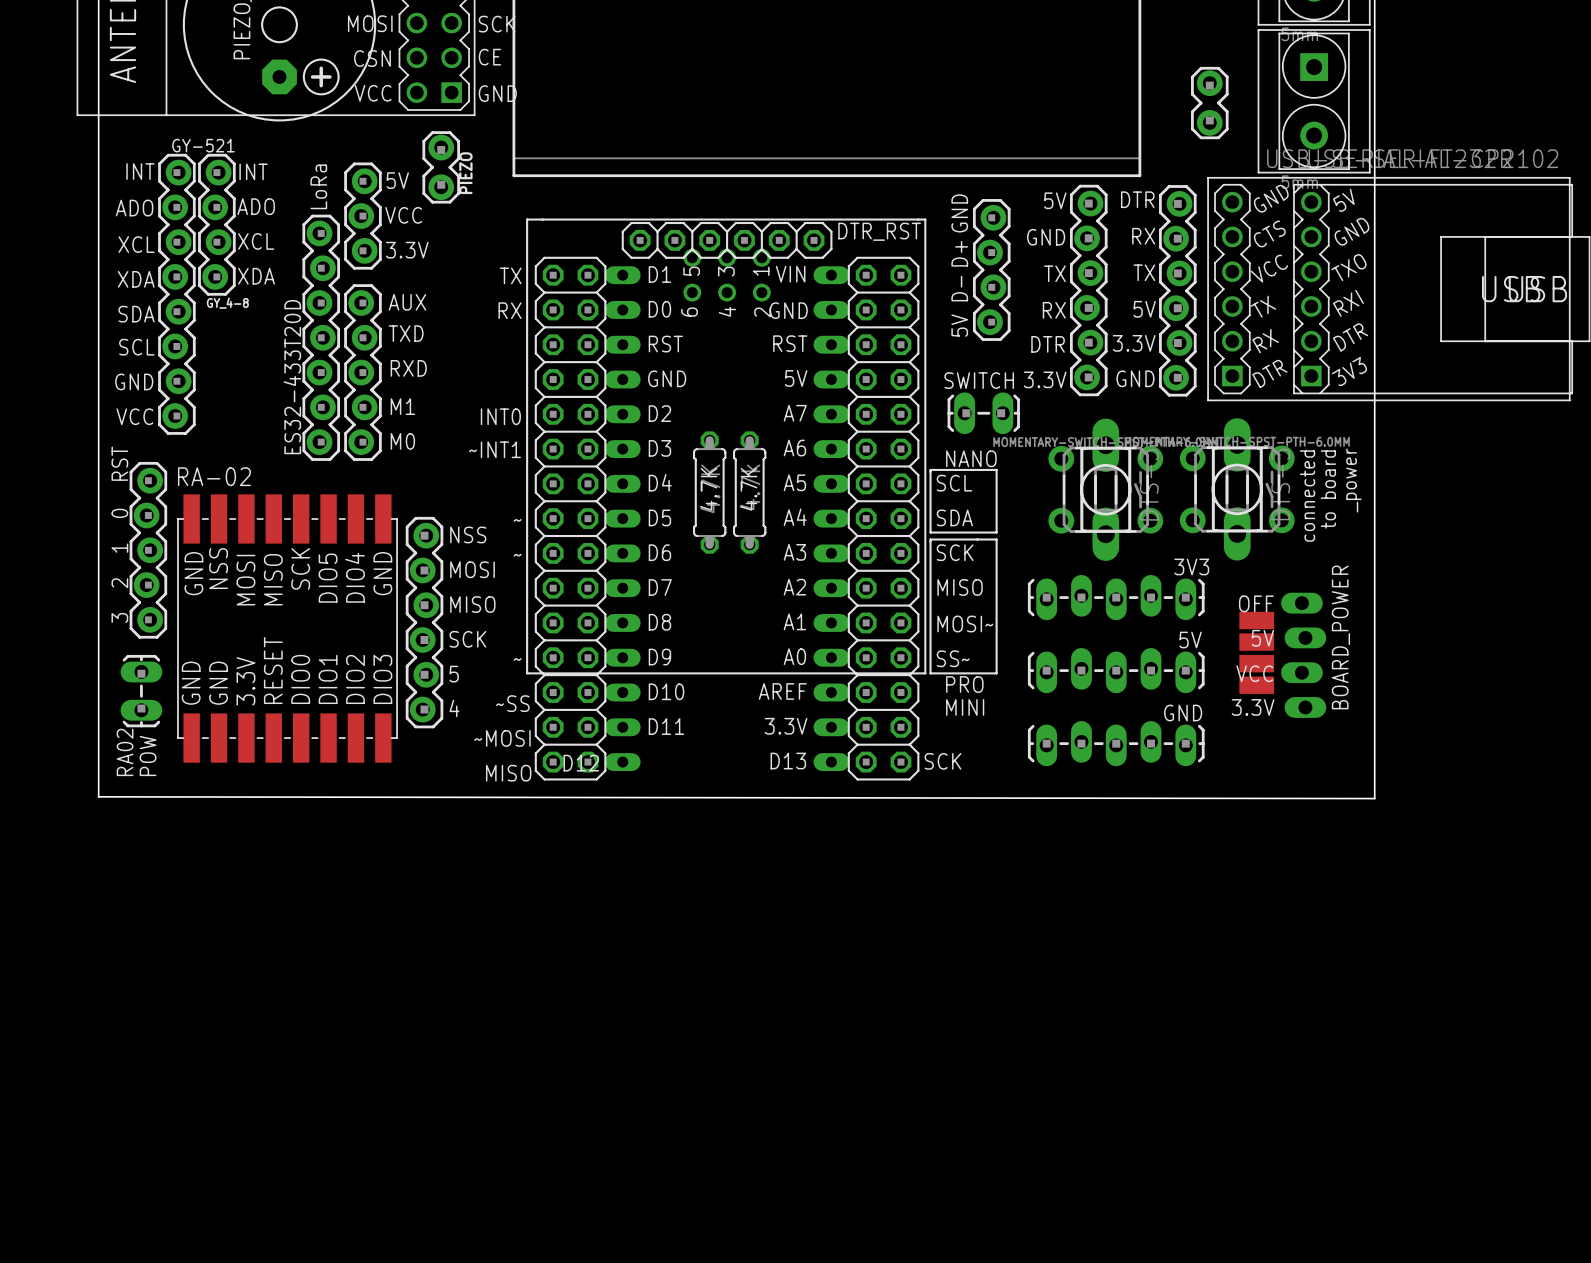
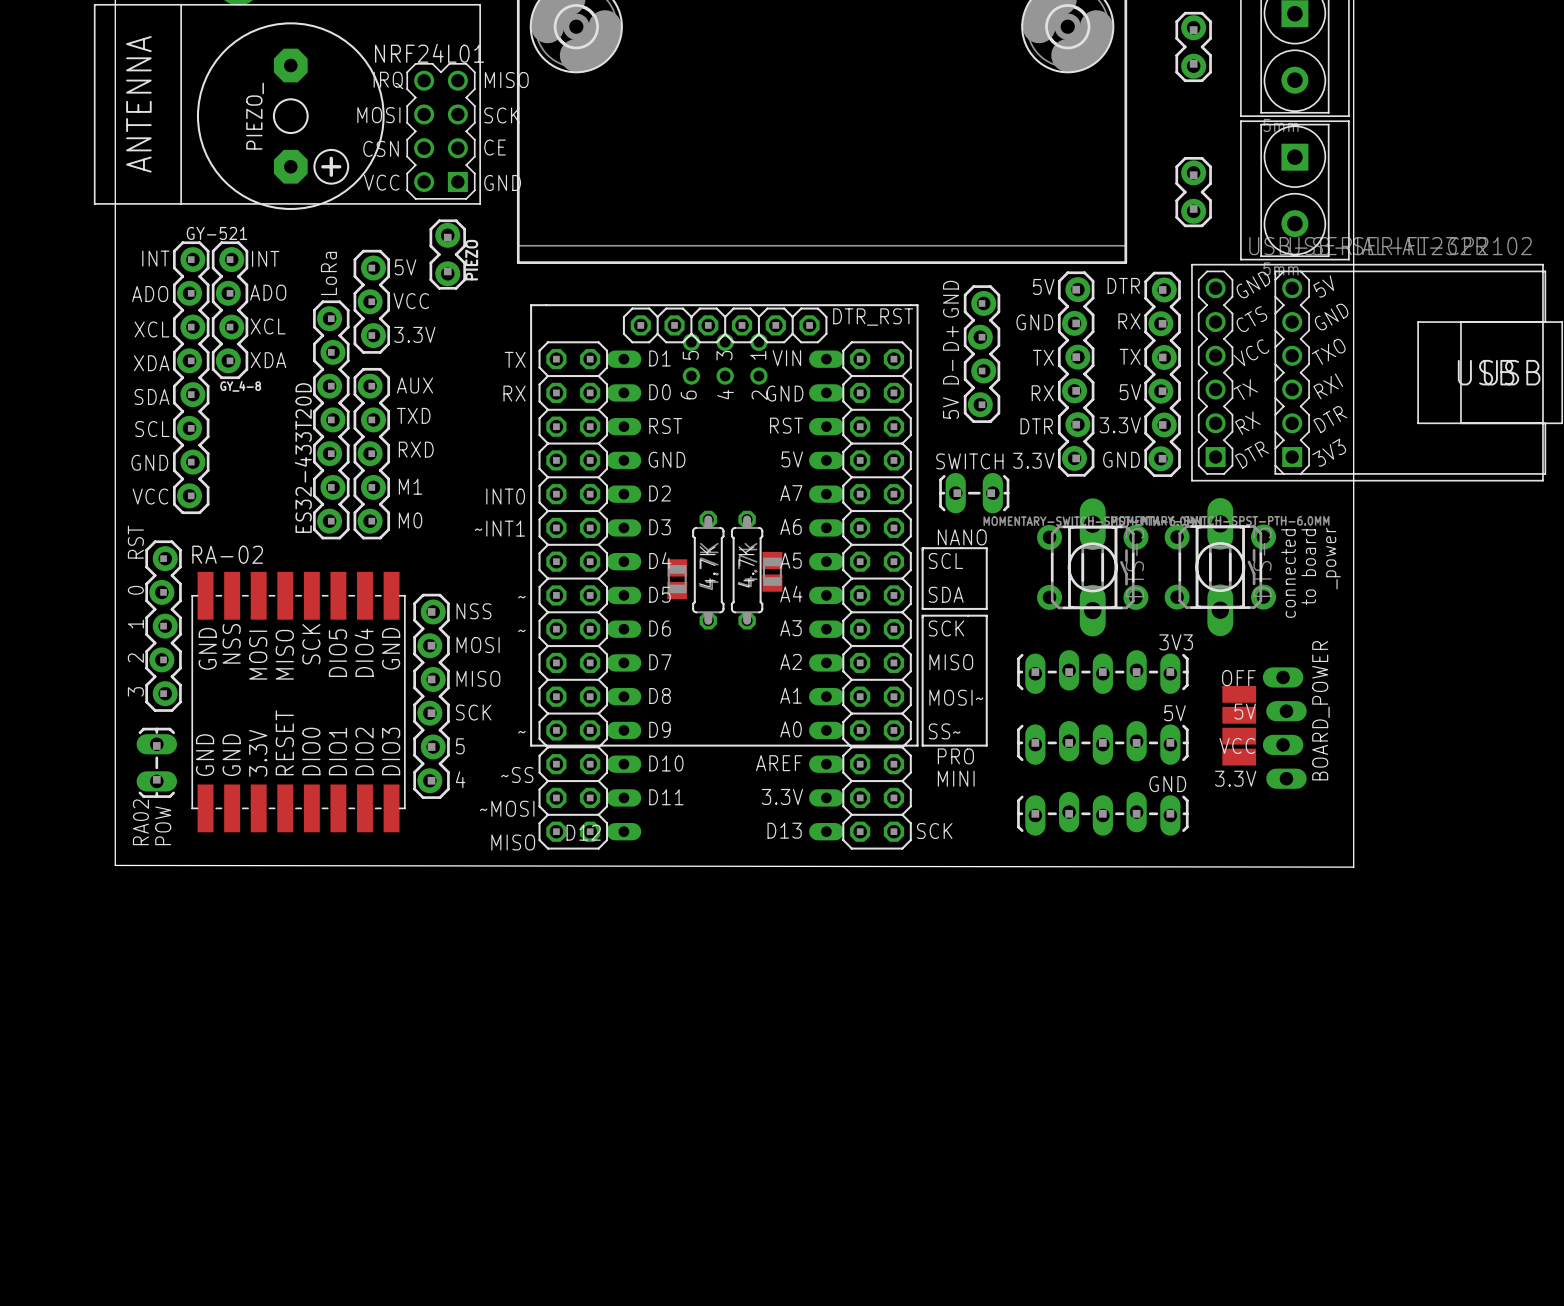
part: none -> (772, 571)
part: none -> (677, 579)

